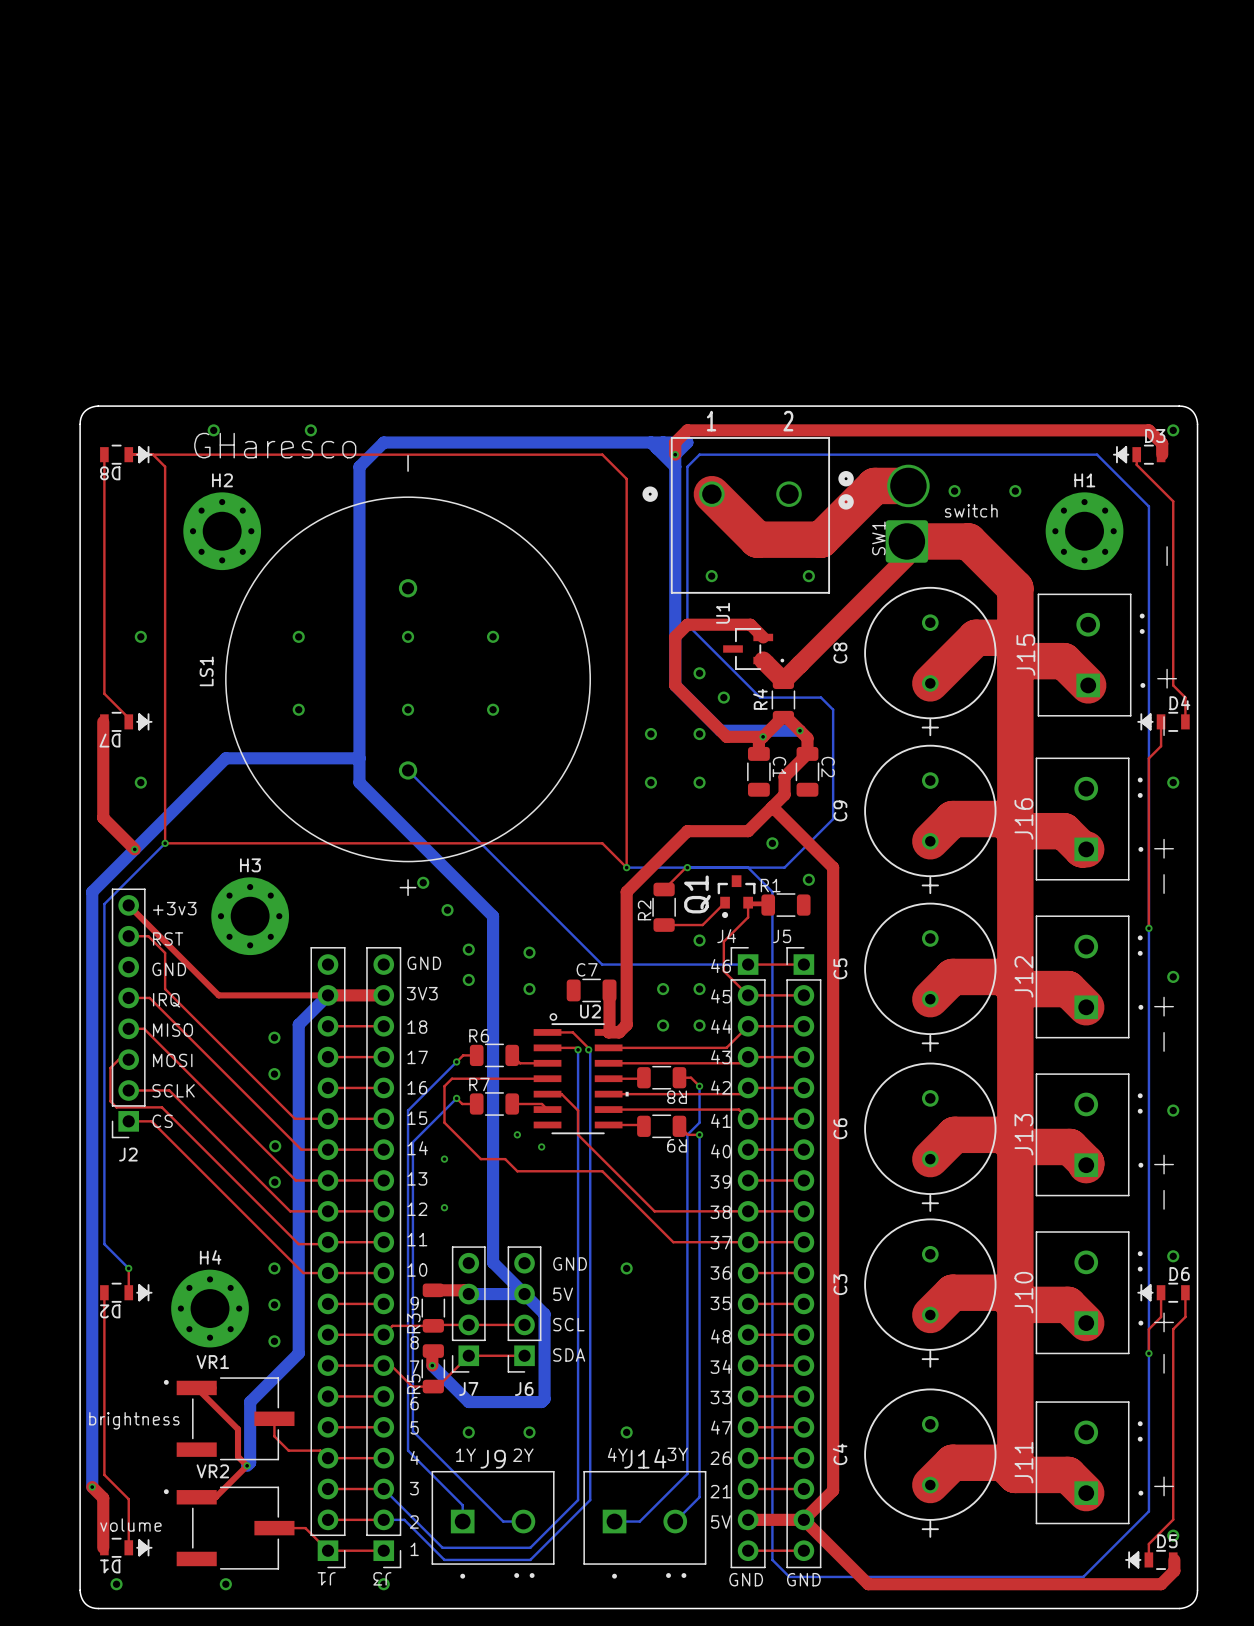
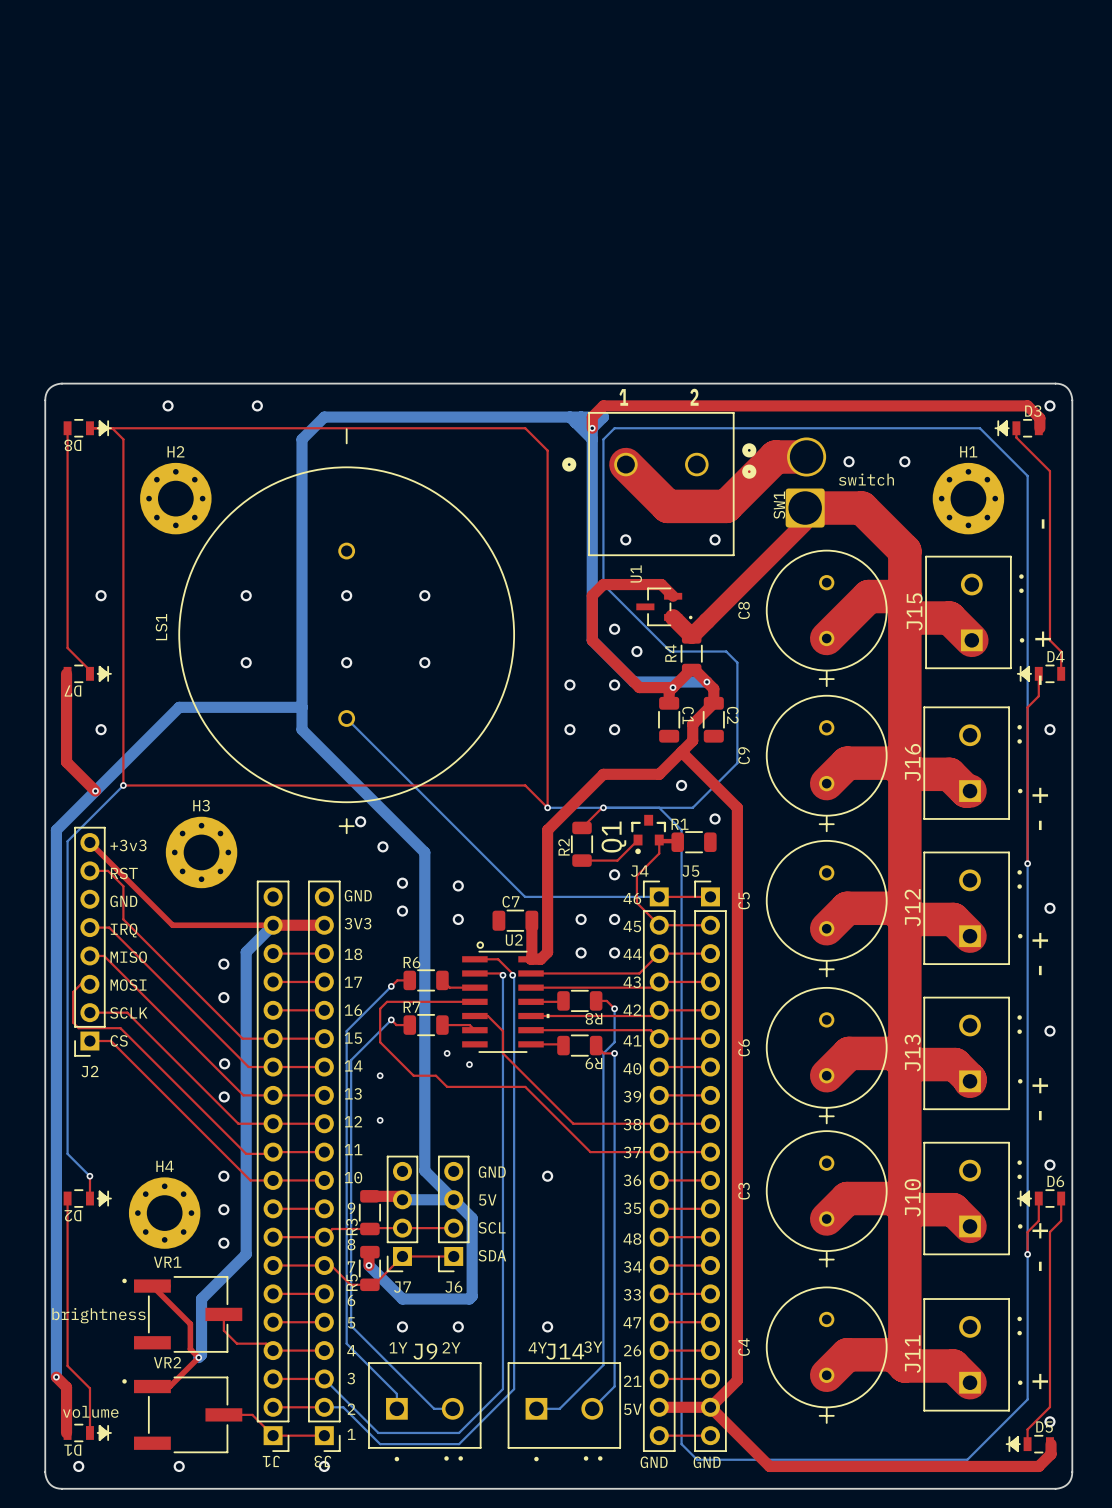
text: GHaresco (275, 445) -> none

